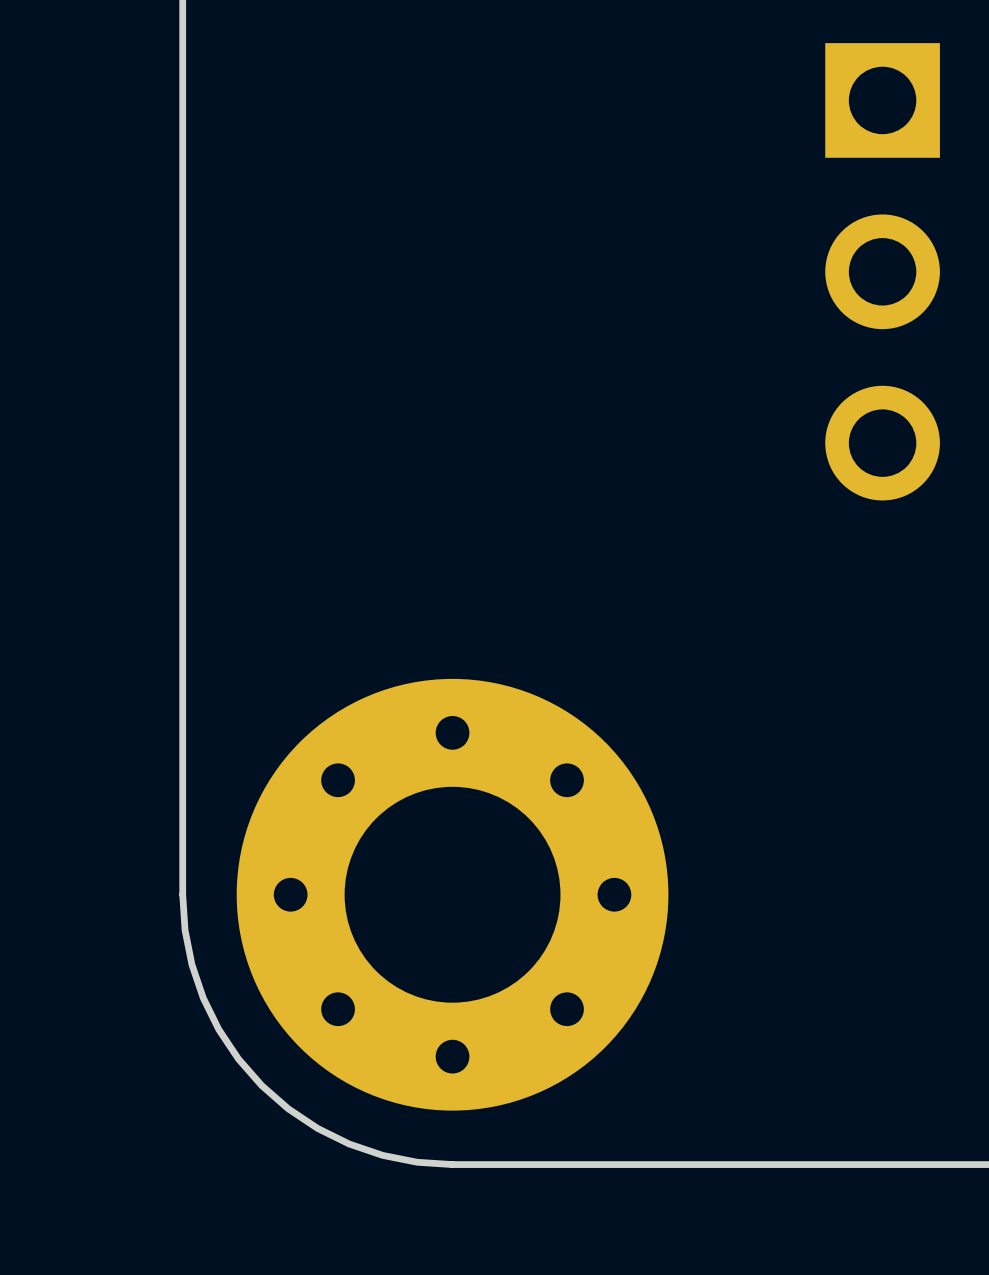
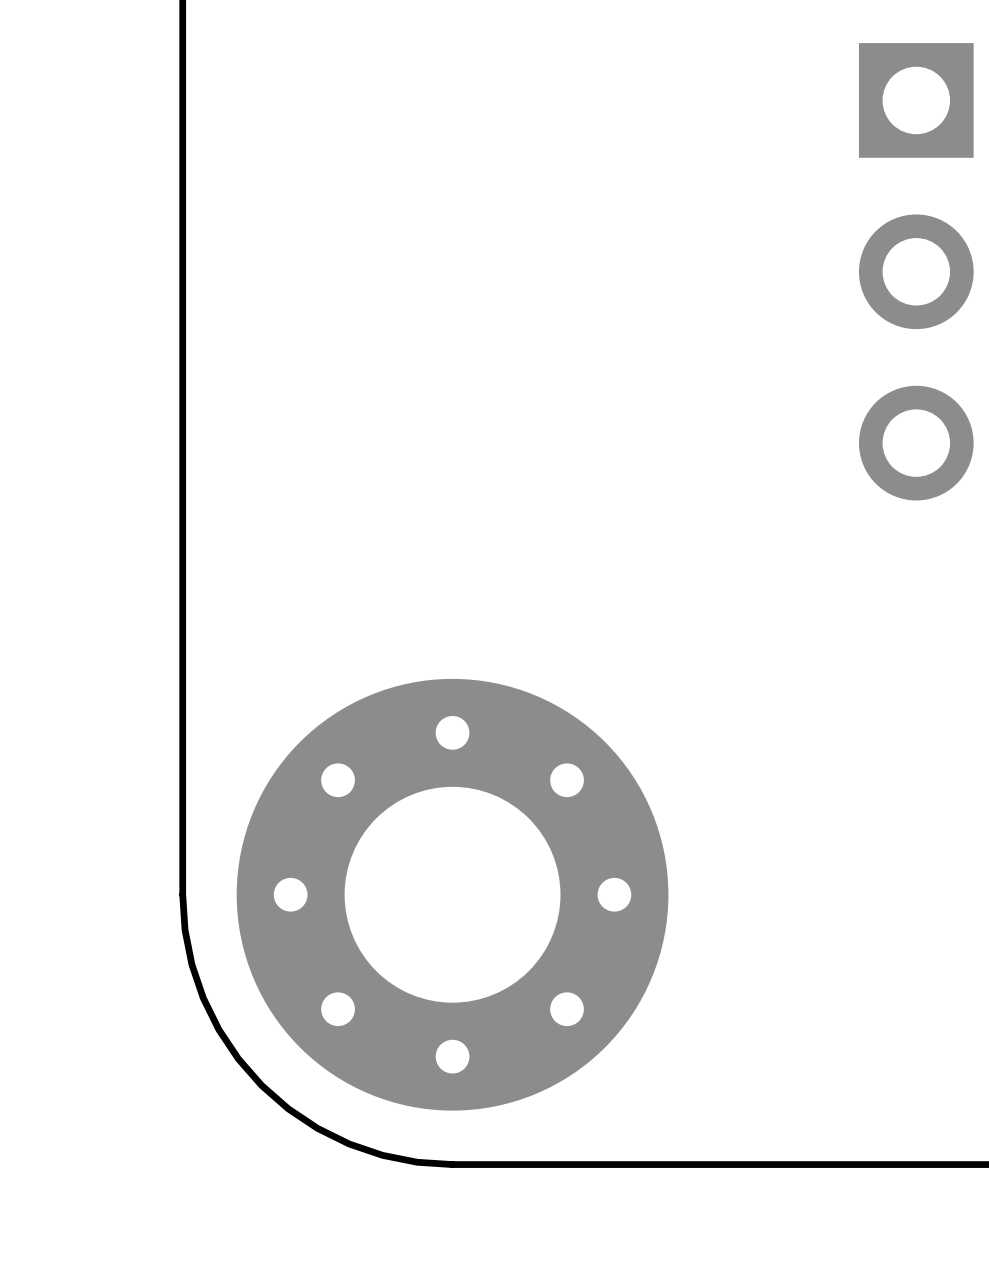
part position: (882, 271) -> (916, 271)

